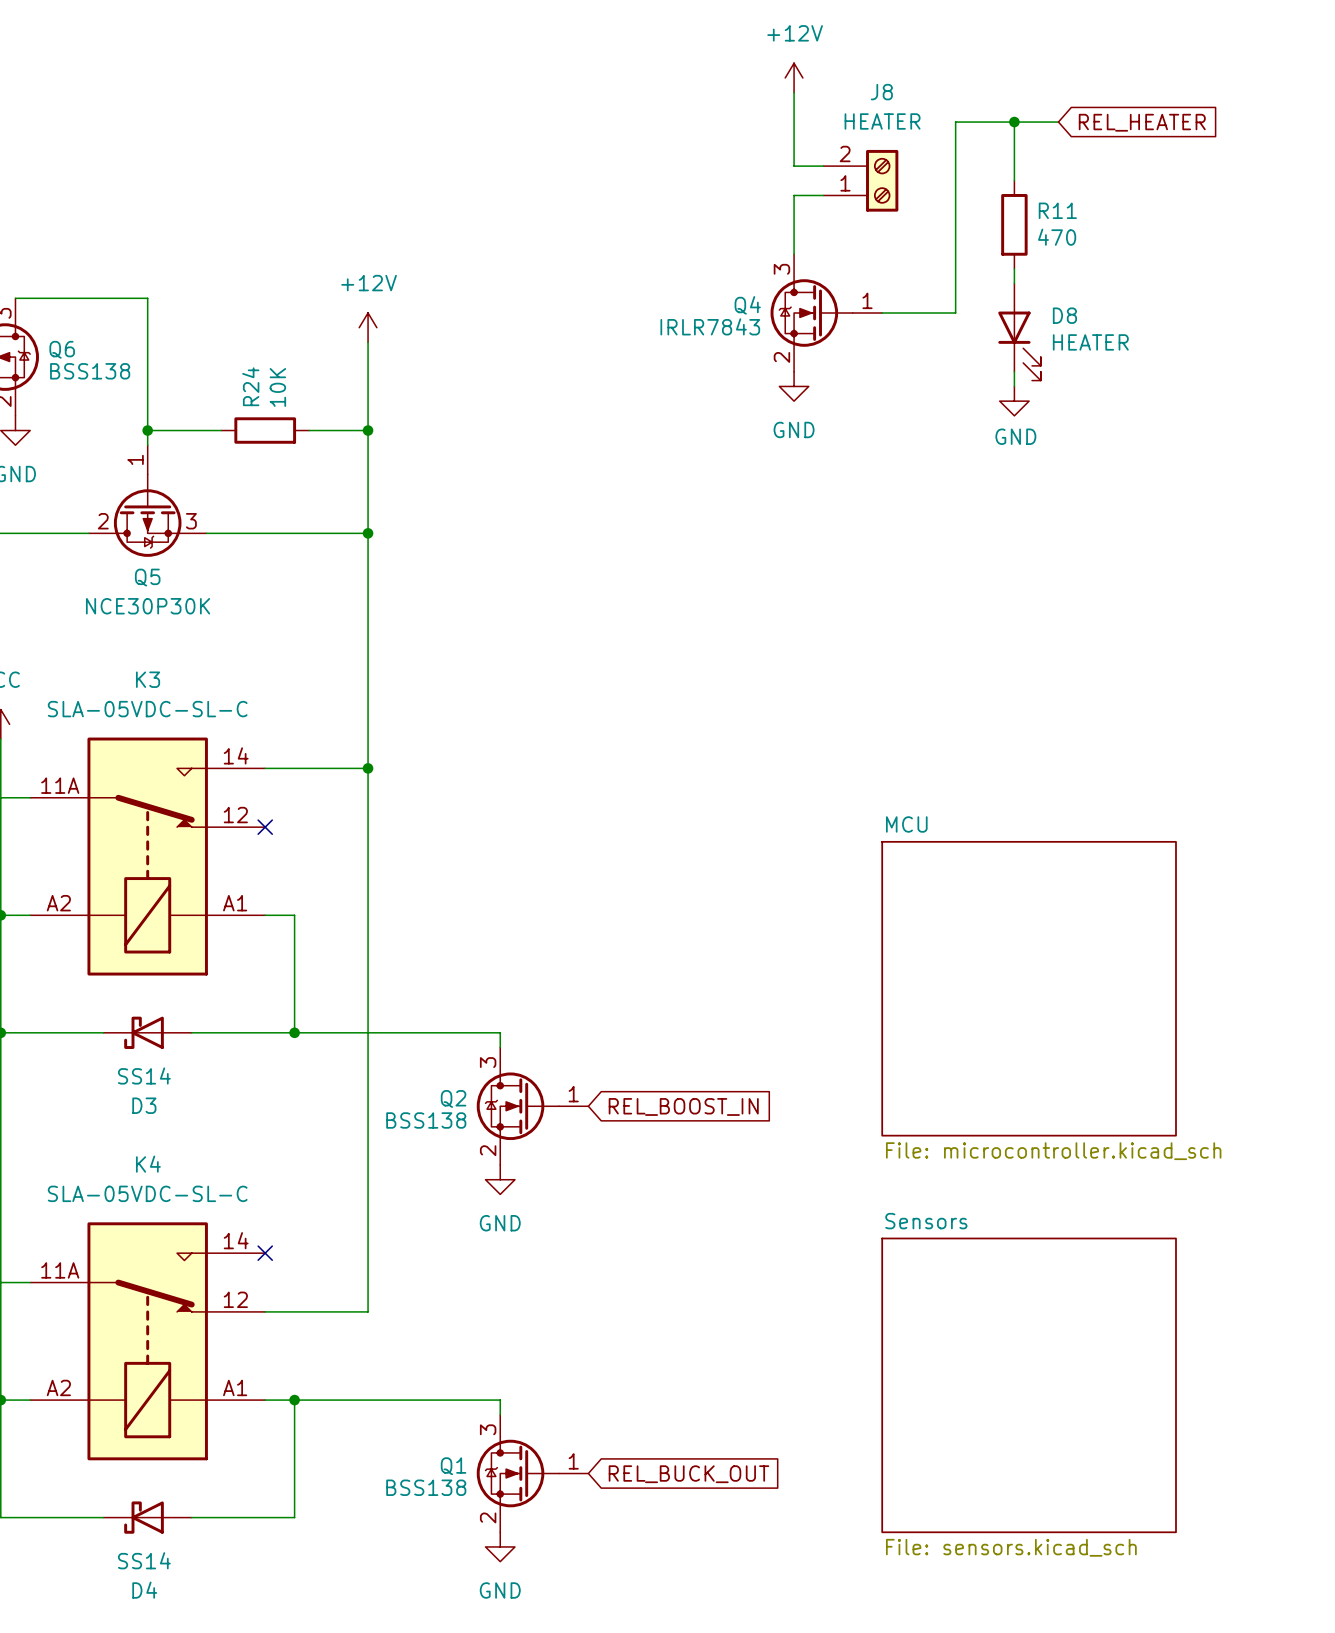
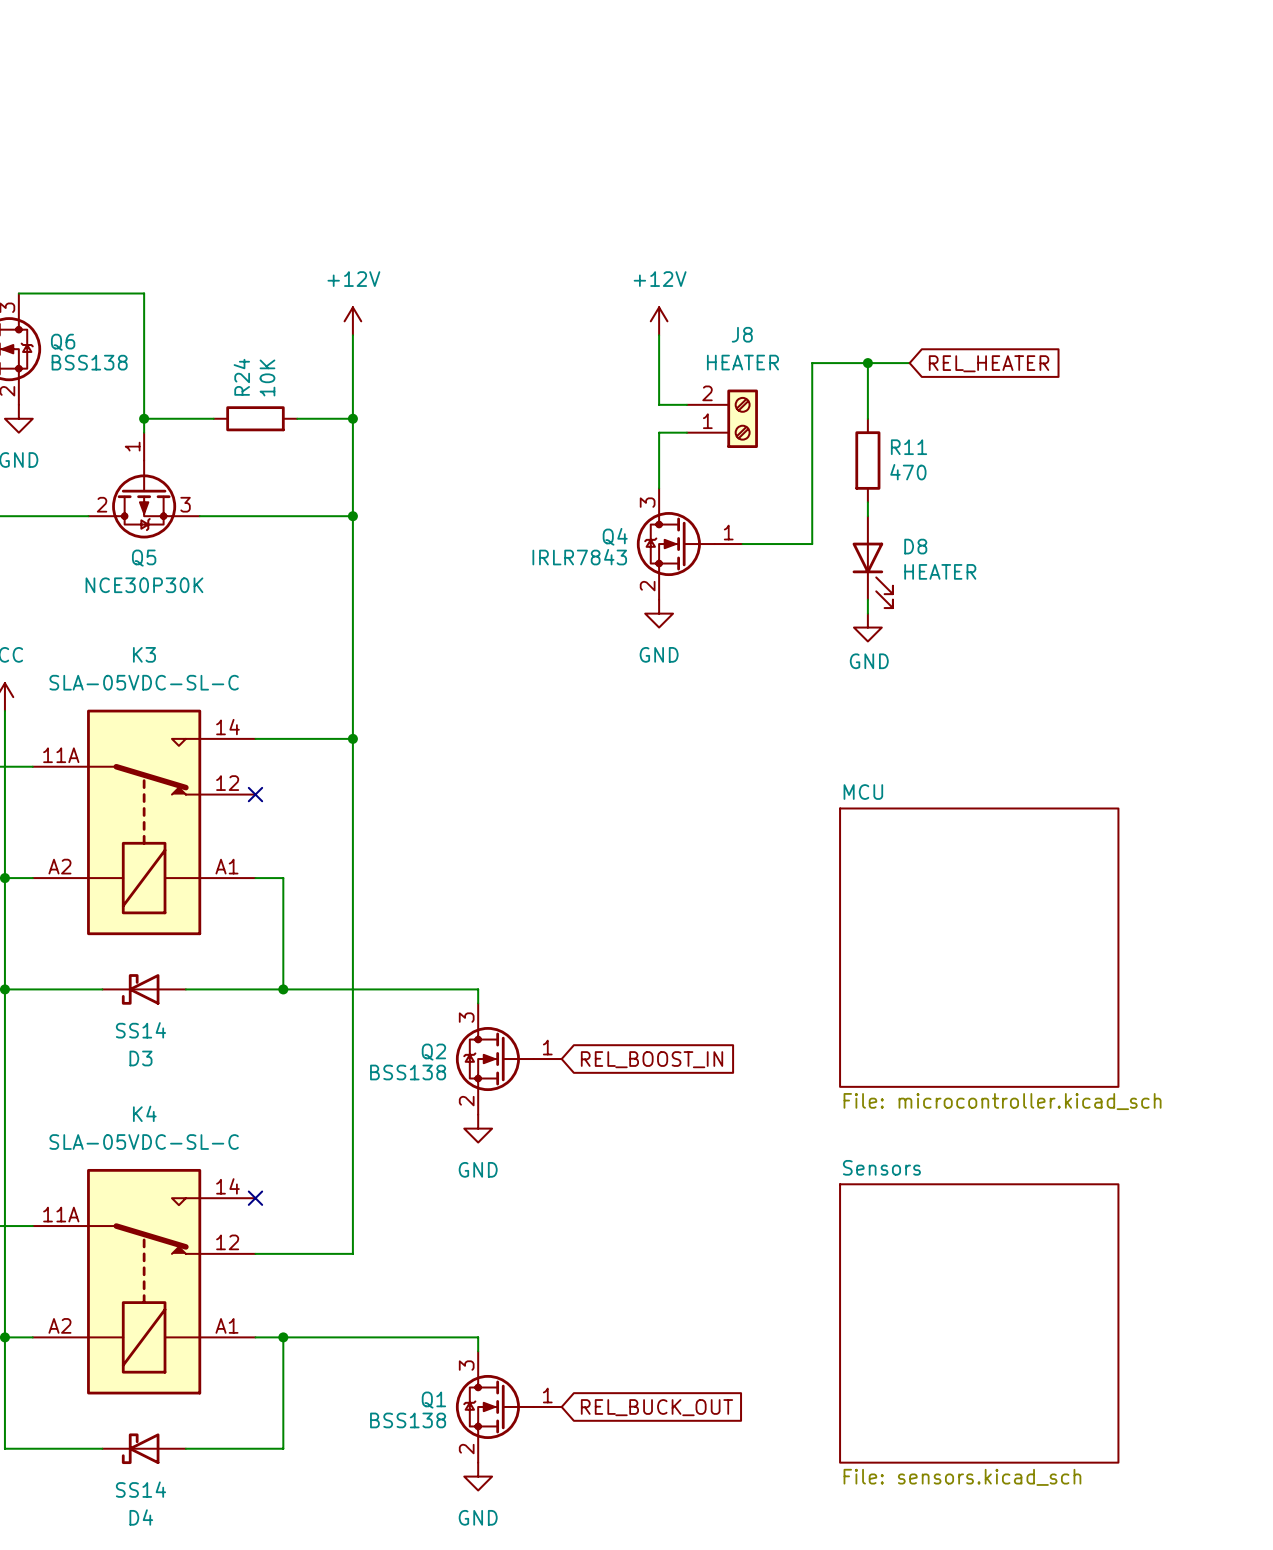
power symbol position: +12V (794, 77) -> +12V (659, 321)
wire: (794, 92) (794, 166) (823, 166) -> (659, 335) (659, 404) (686, 404)
wire: (1014, 122) (1014, 180) -> (867, 363) (867, 418)
junction: (1014, 122) -> none
wire: (1058, 122) (955, 122) (955, 313) (882, 313) -> (909, 363) (812, 363) (812, 544) (742, 544)
global label position: REL_HEATER (1142, 122) -> REL_HEATER (989, 363)
J8 position: (860, 180) -> (722, 418)
wire: (823, 195) (794, 195) (794, 254) -> (686, 432) (659, 432) (659, 488)
R11 position: (1014, 224) -> (867, 460)
wire: (1014, 268) (1014, 283) -> (867, 502) (867, 516)
Q4 position: (826, 313) -> (689, 544)
D8 position: (1019, 332) -> (872, 562)
junction: none -> (867, 363)
wire: (1014, 371) (1014, 386) -> (867, 599) (867, 613)
power symbol: GND (794, 386) -> none
power symbol: GND (1014, 401) -> none
power symbol: none -> GND (659, 613)
power symbol: none -> GND (867, 627)

